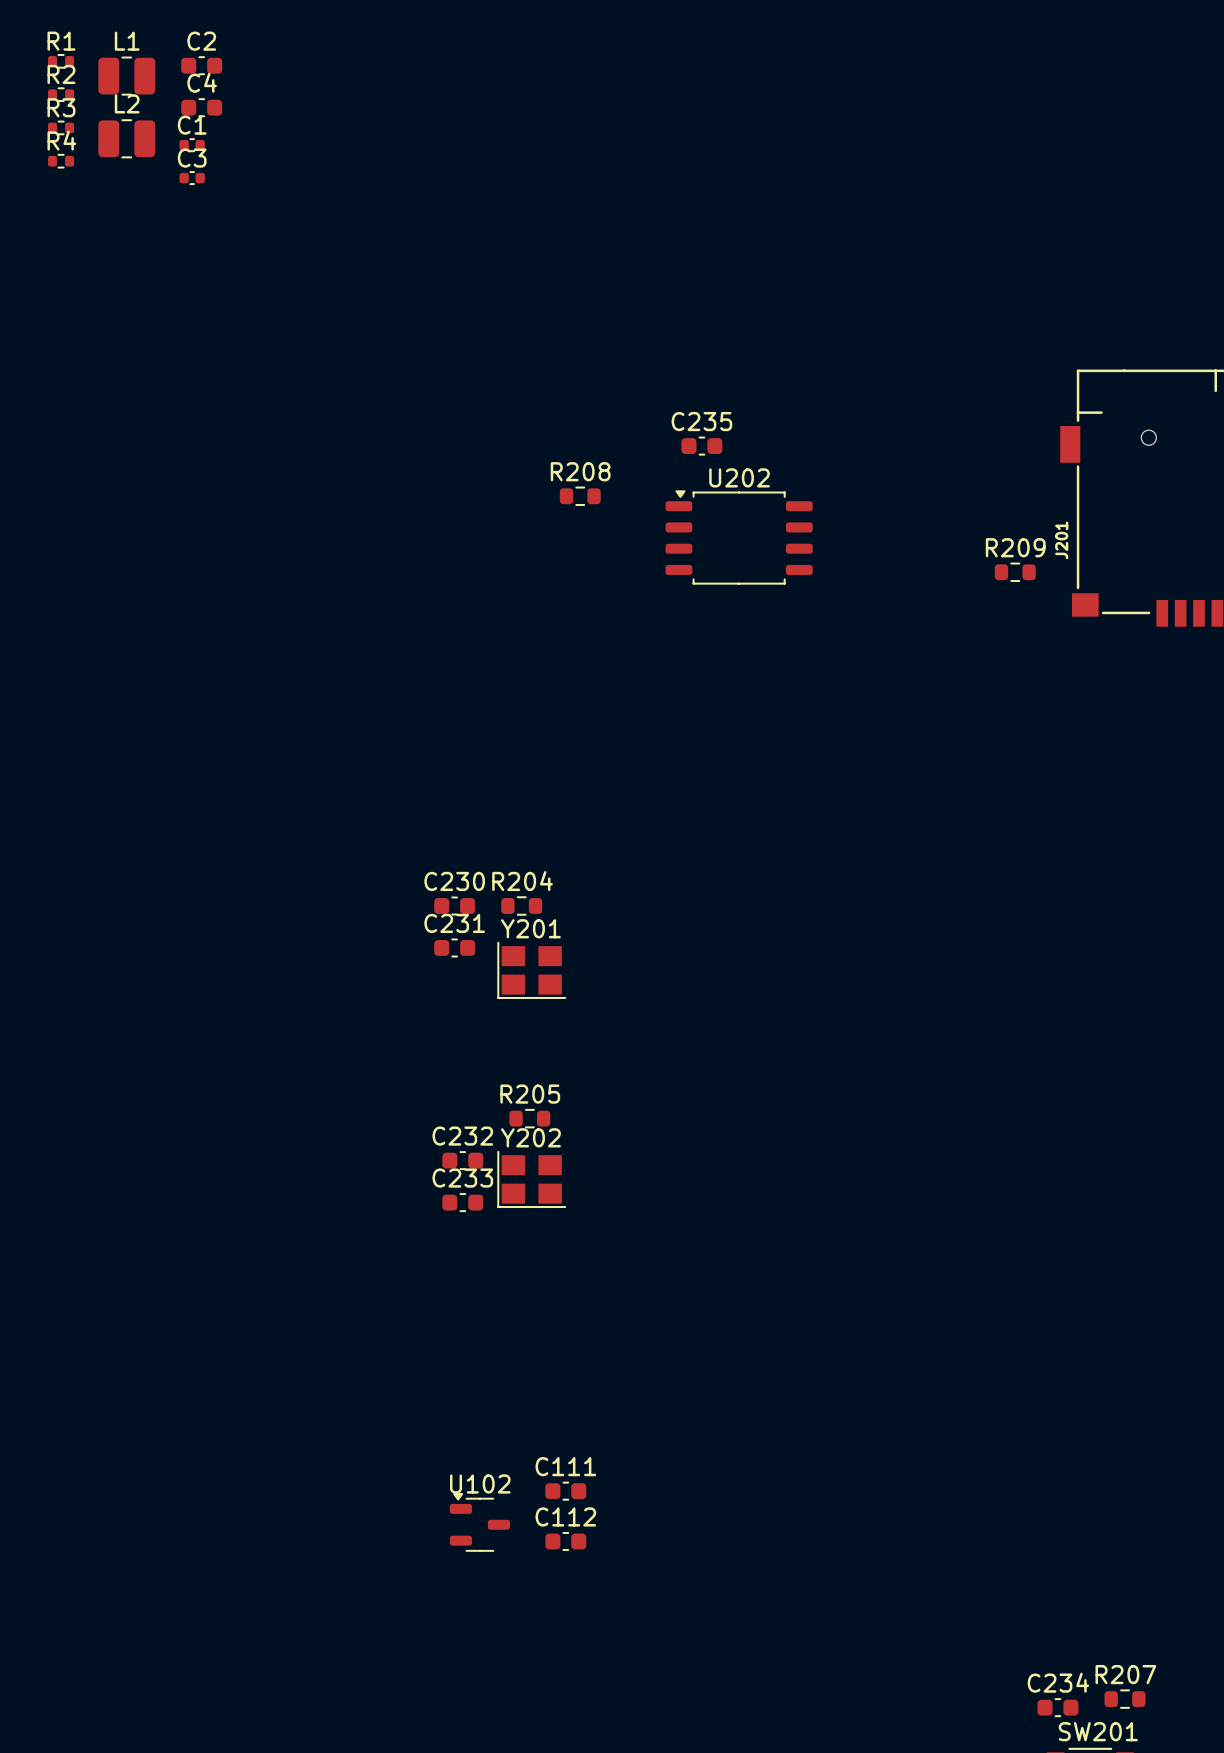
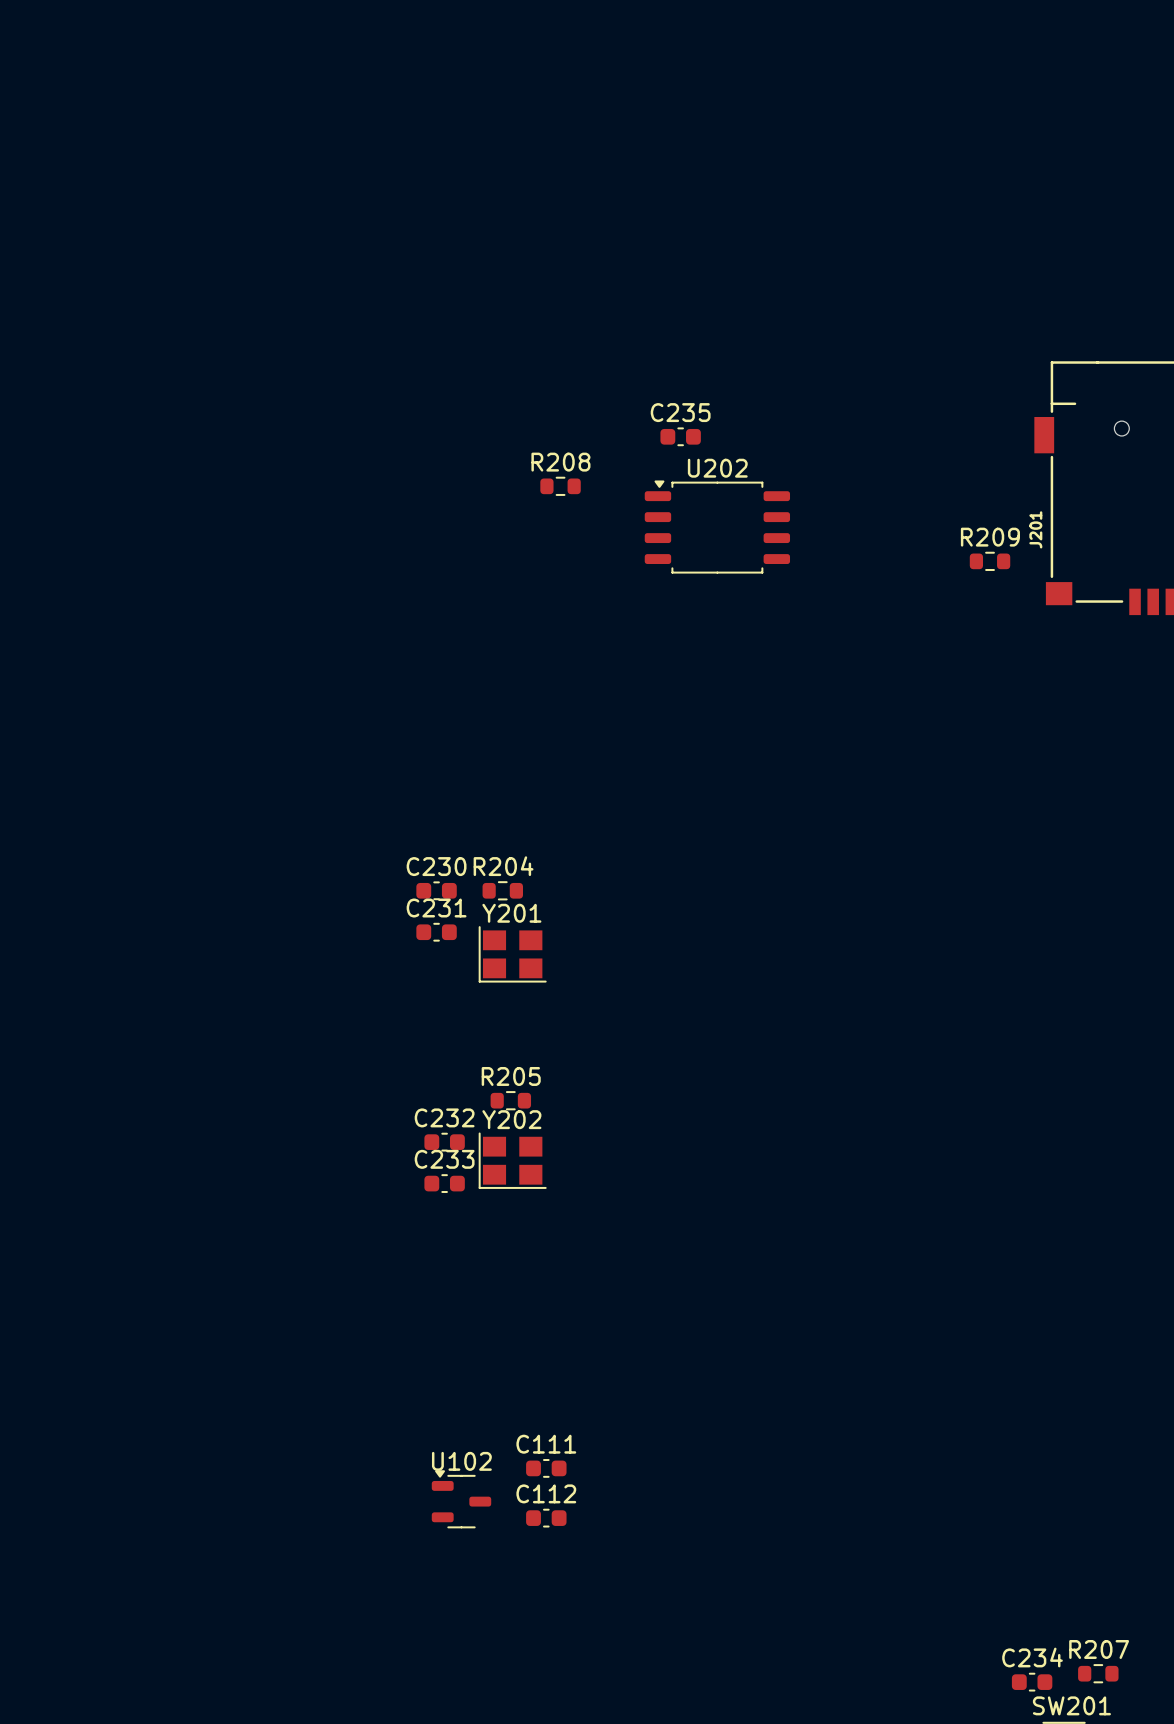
R1: (61, 61) -> none
C2: (201, 65) -> none
L1: (126, 76) -> none
R2: (61, 94) -> none
C4: (201, 107) -> none
R3: (61, 127) -> none
L2: (126, 138) -> none
C1: (192, 145) -> none
R4: (61, 161) -> none
C3: (192, 178) -> none

